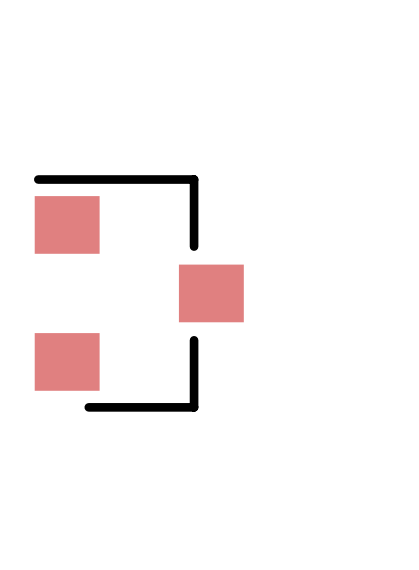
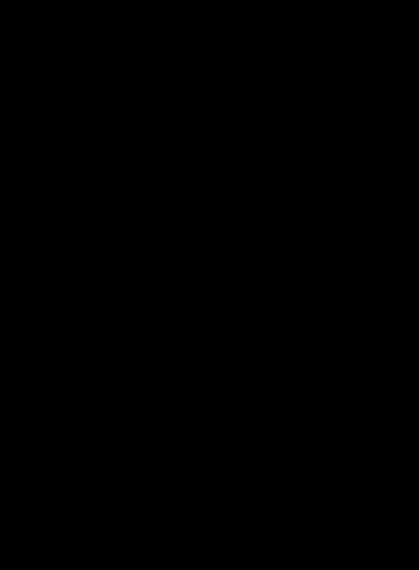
part: (138, 293) -> none

